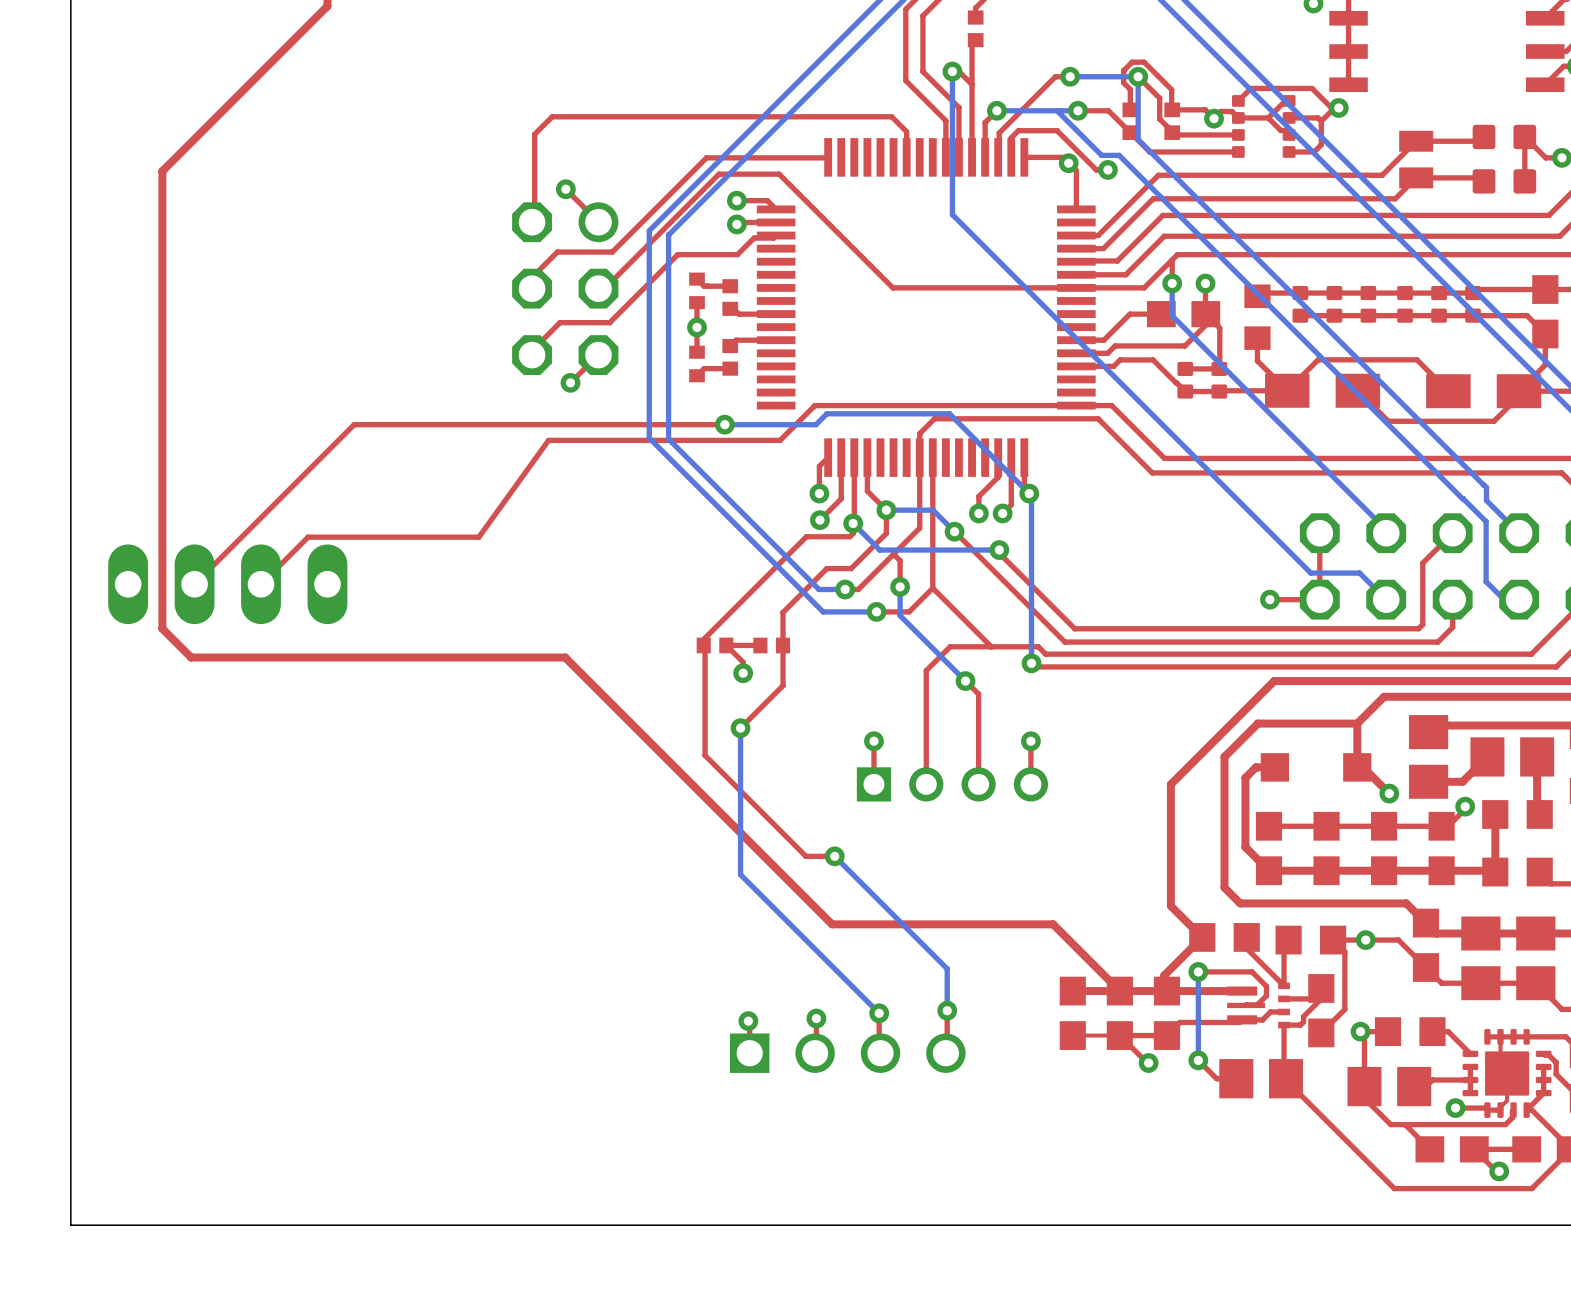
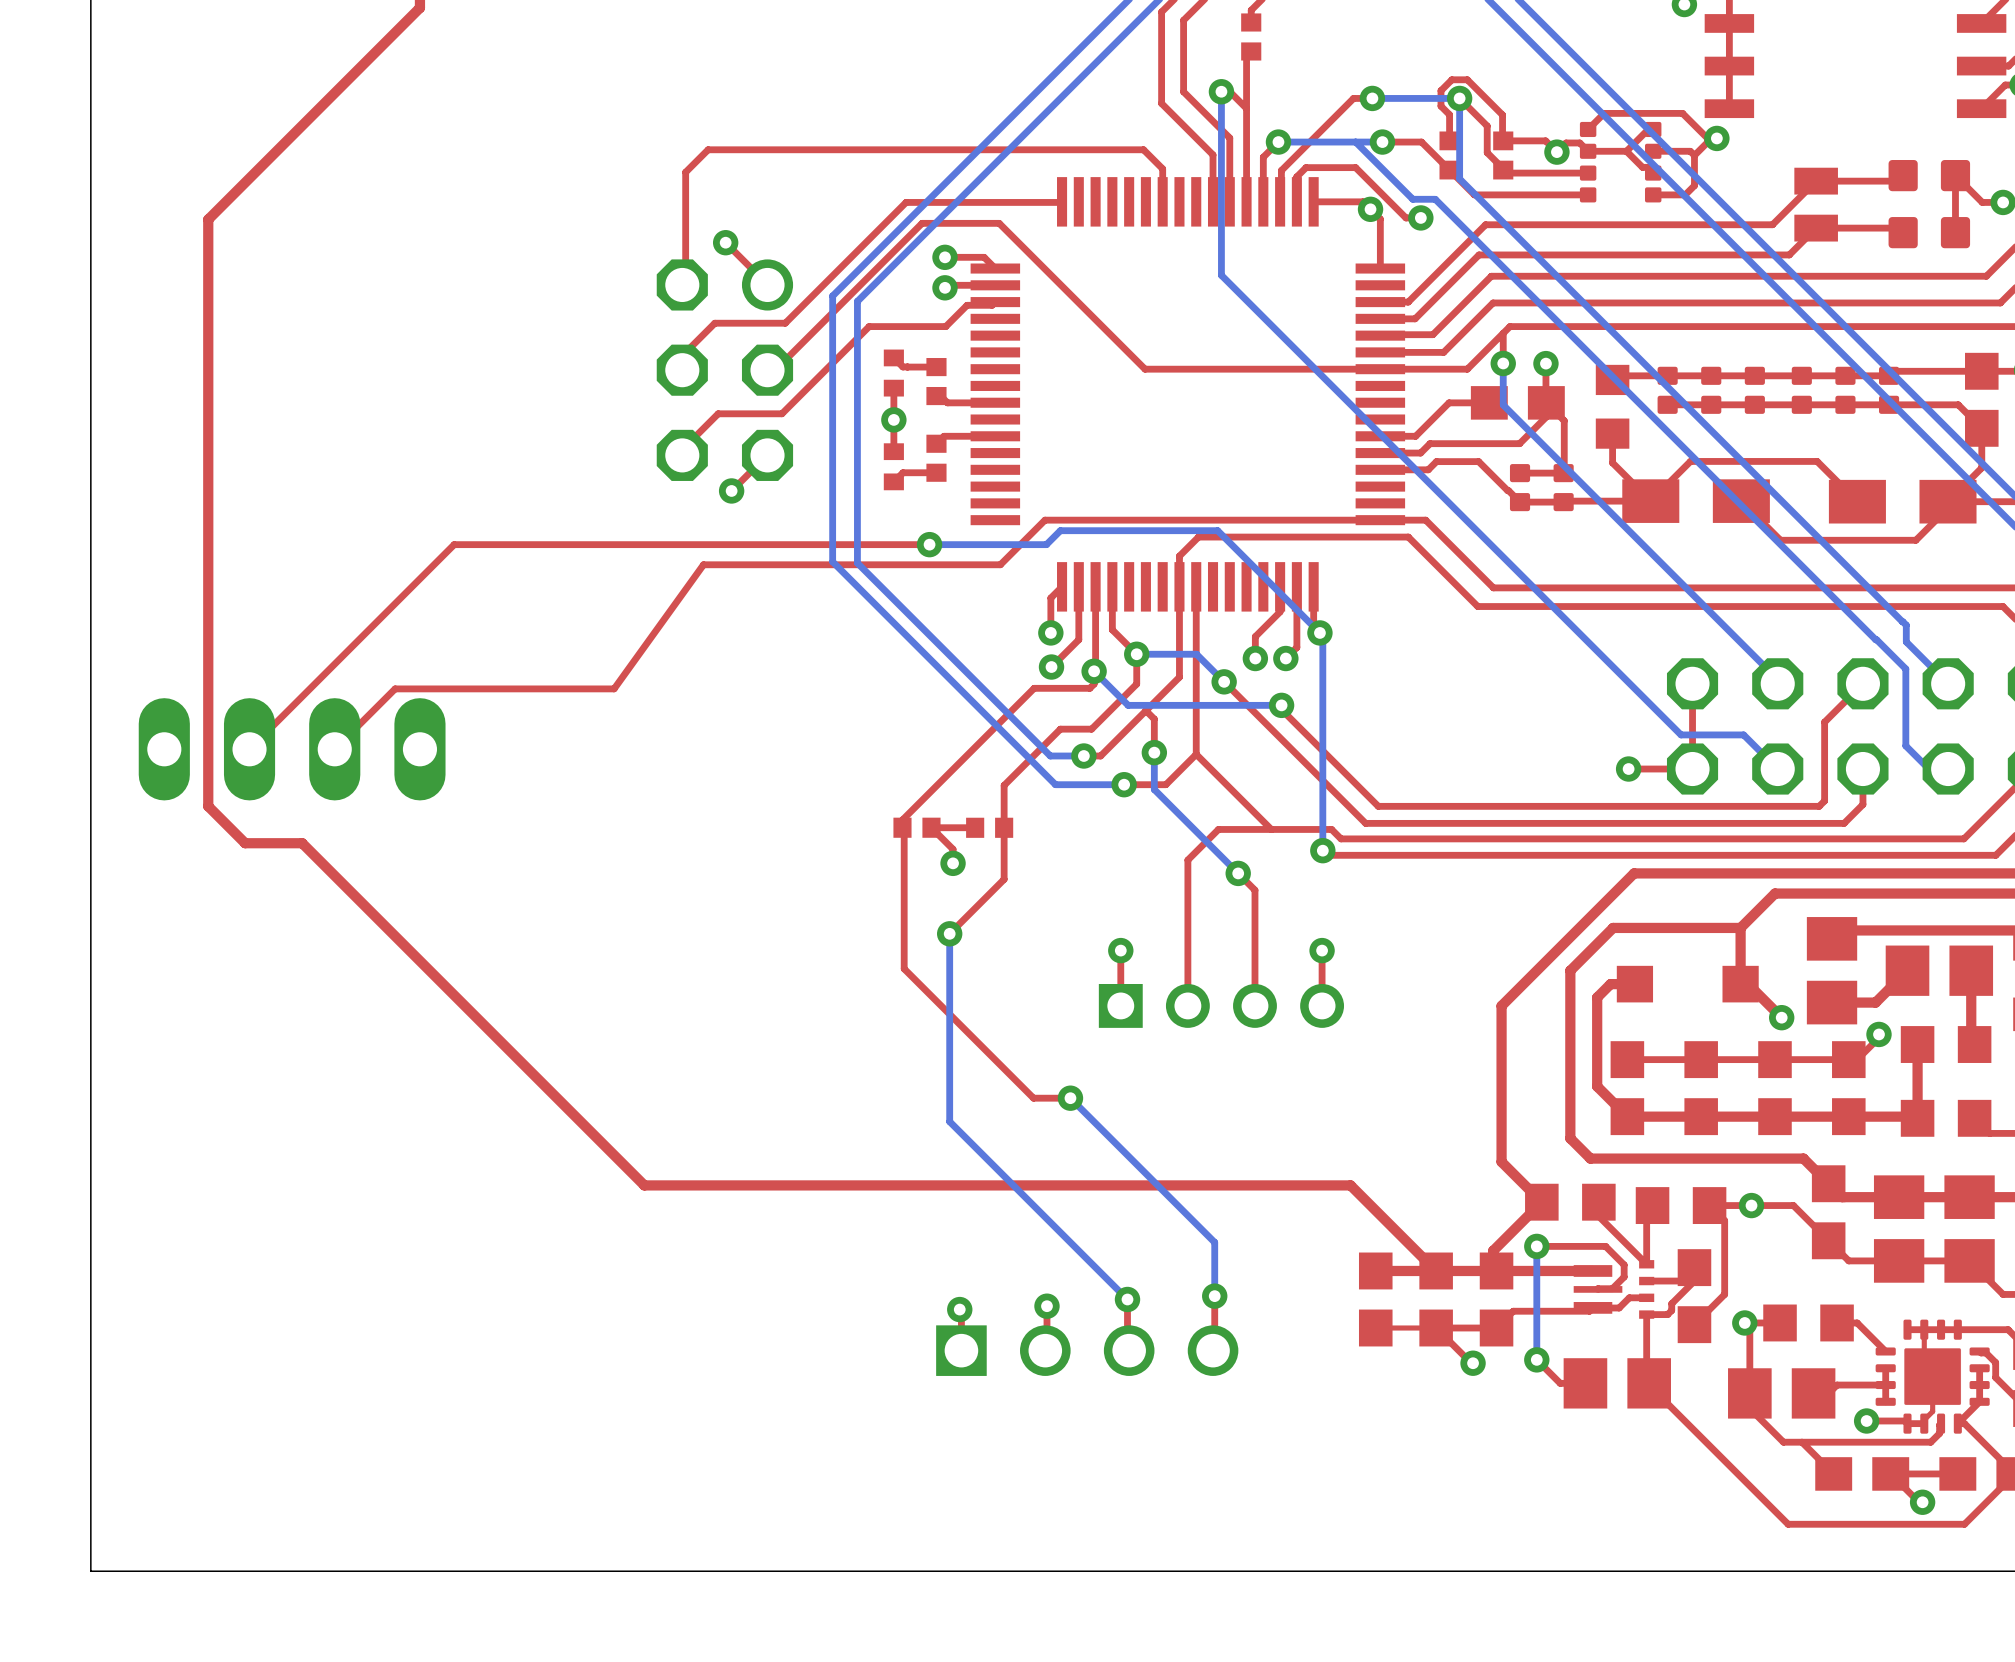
top track: (235, 657) (565, 657) (832, 924) -> (302, 843) (644, 1185) (1067, 1185)

